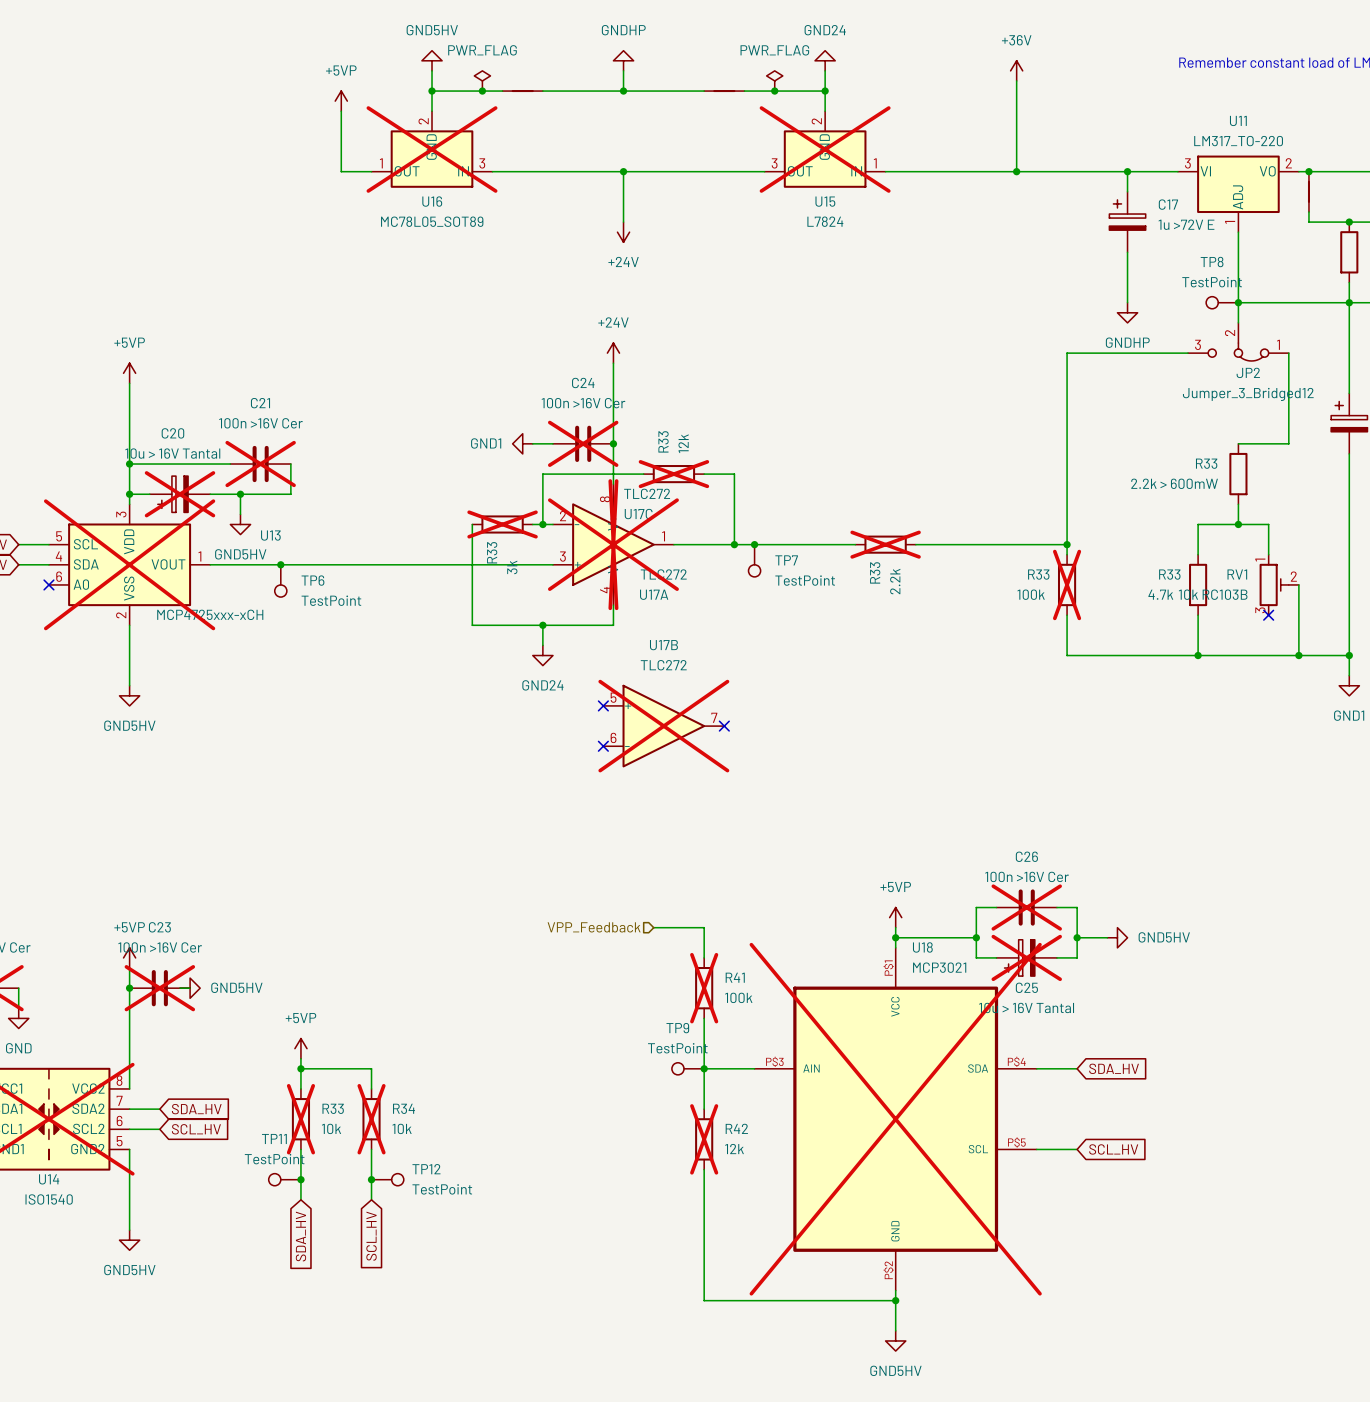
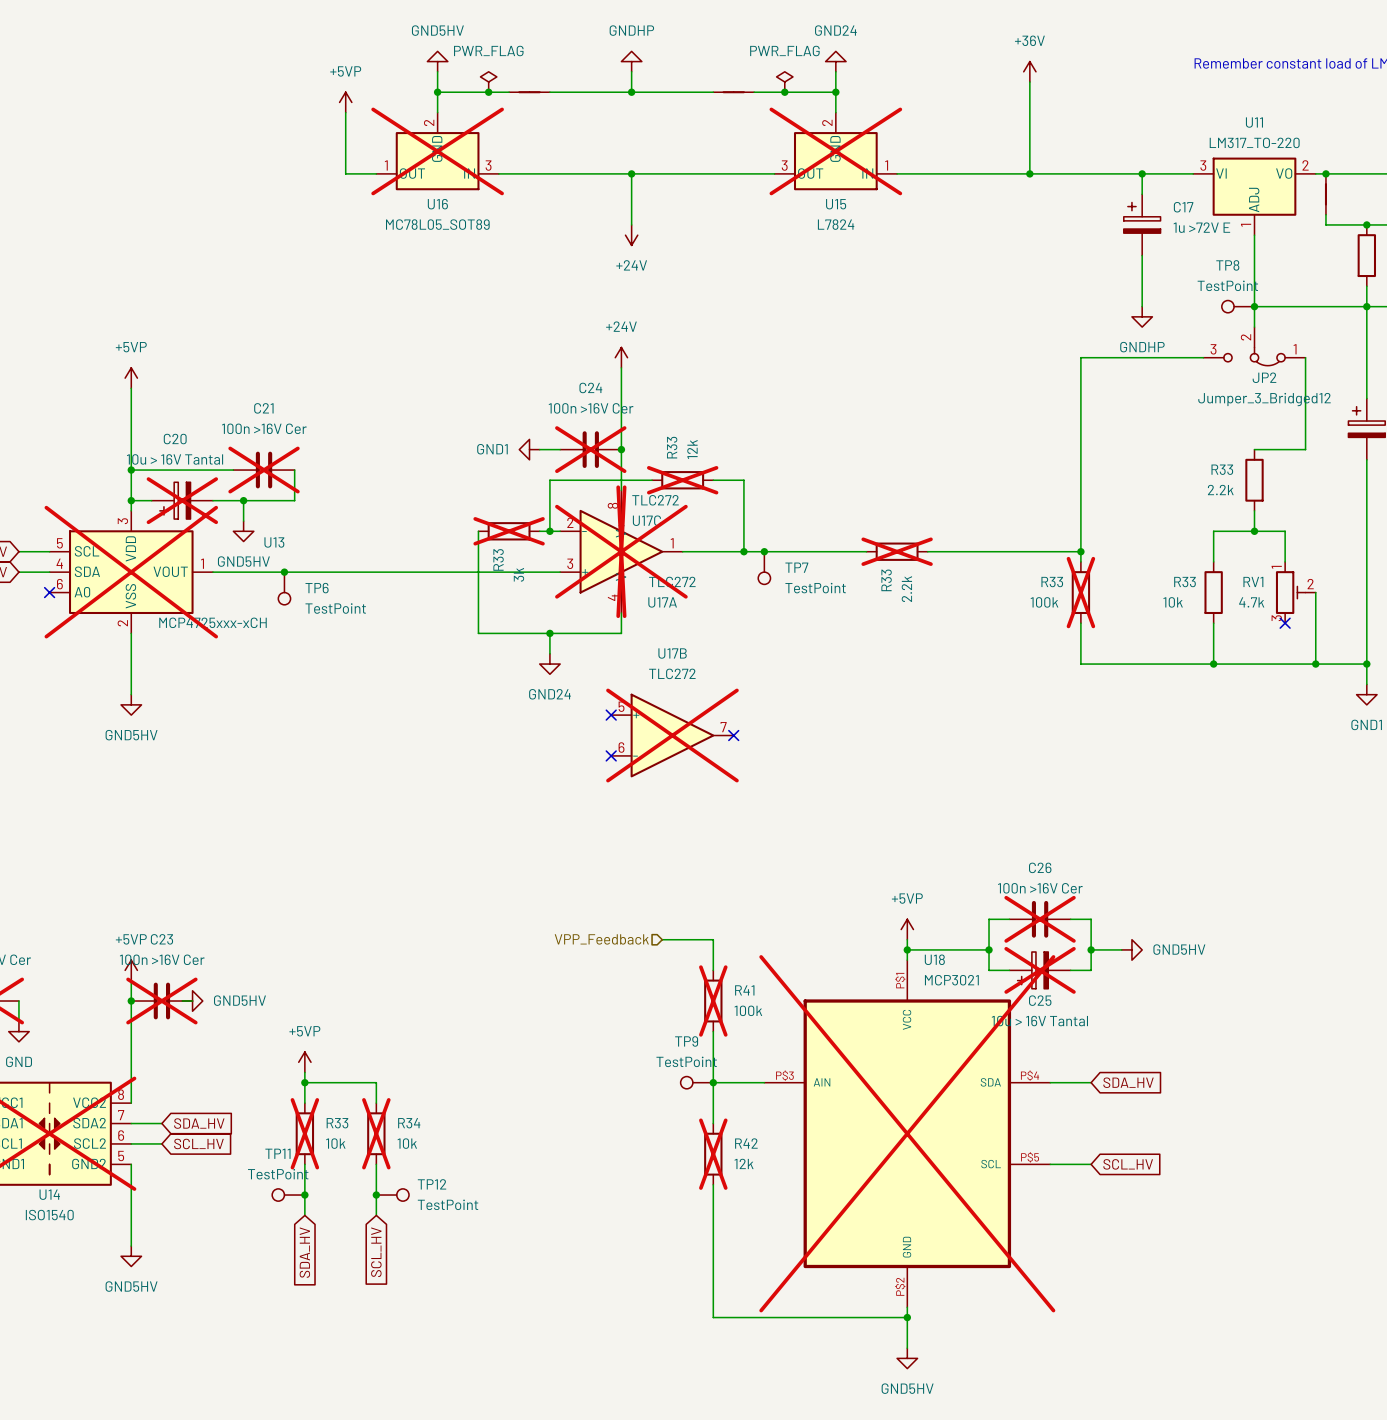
R33 value: 2.2k > 600mW (1174, 483) -> 2.2k (1220, 490)
R33 value: 4.7k (1160, 594) -> 10k (1173, 602)
RV1 value: 10k RC103B (1213, 594) -> 4.7k (1251, 602)

